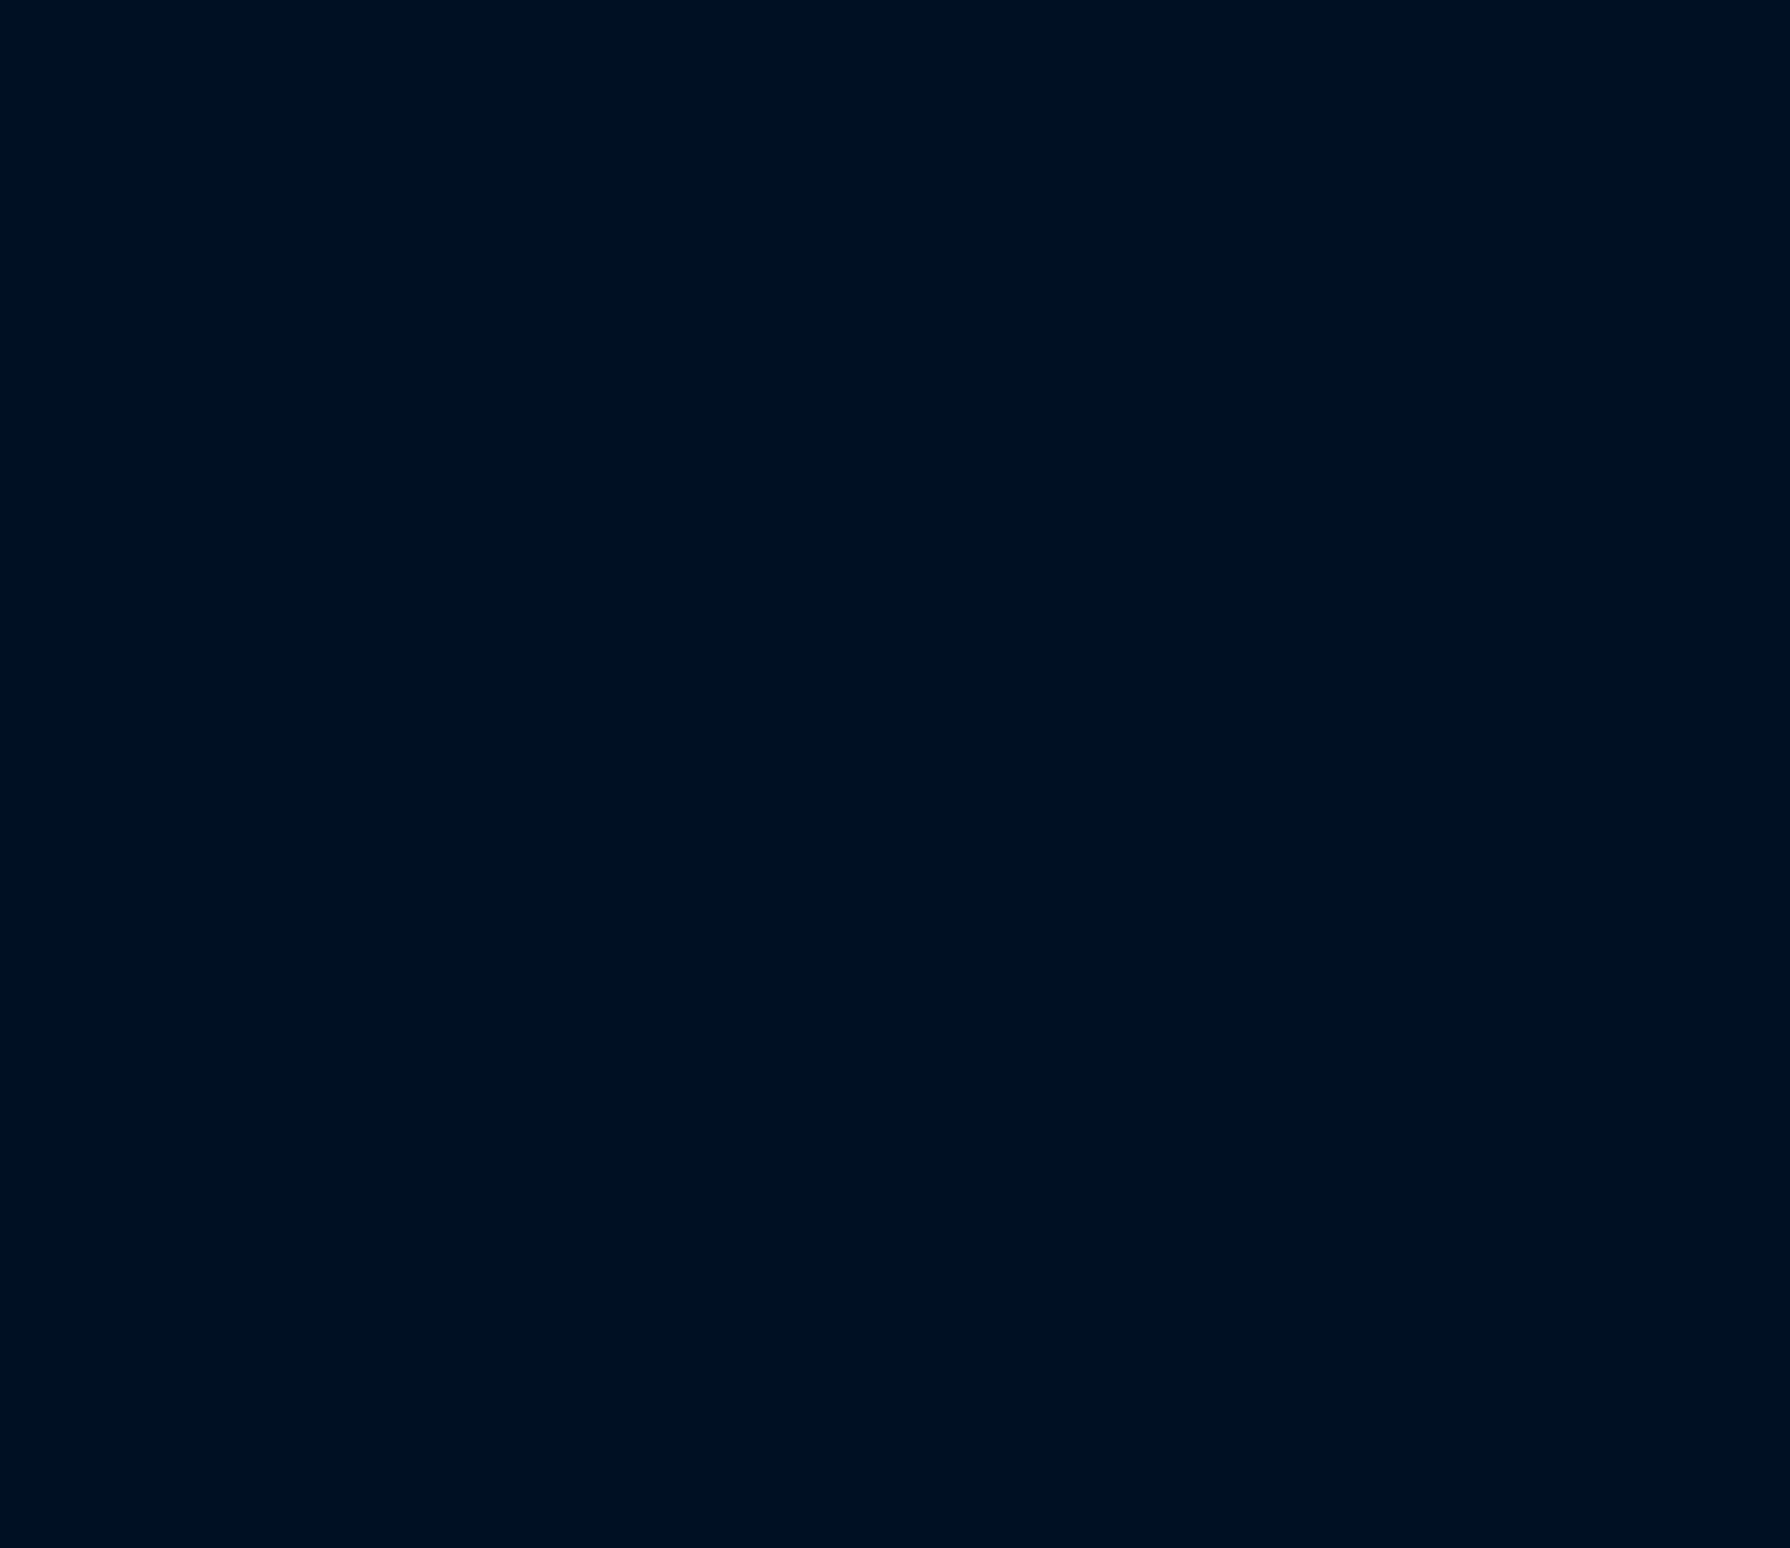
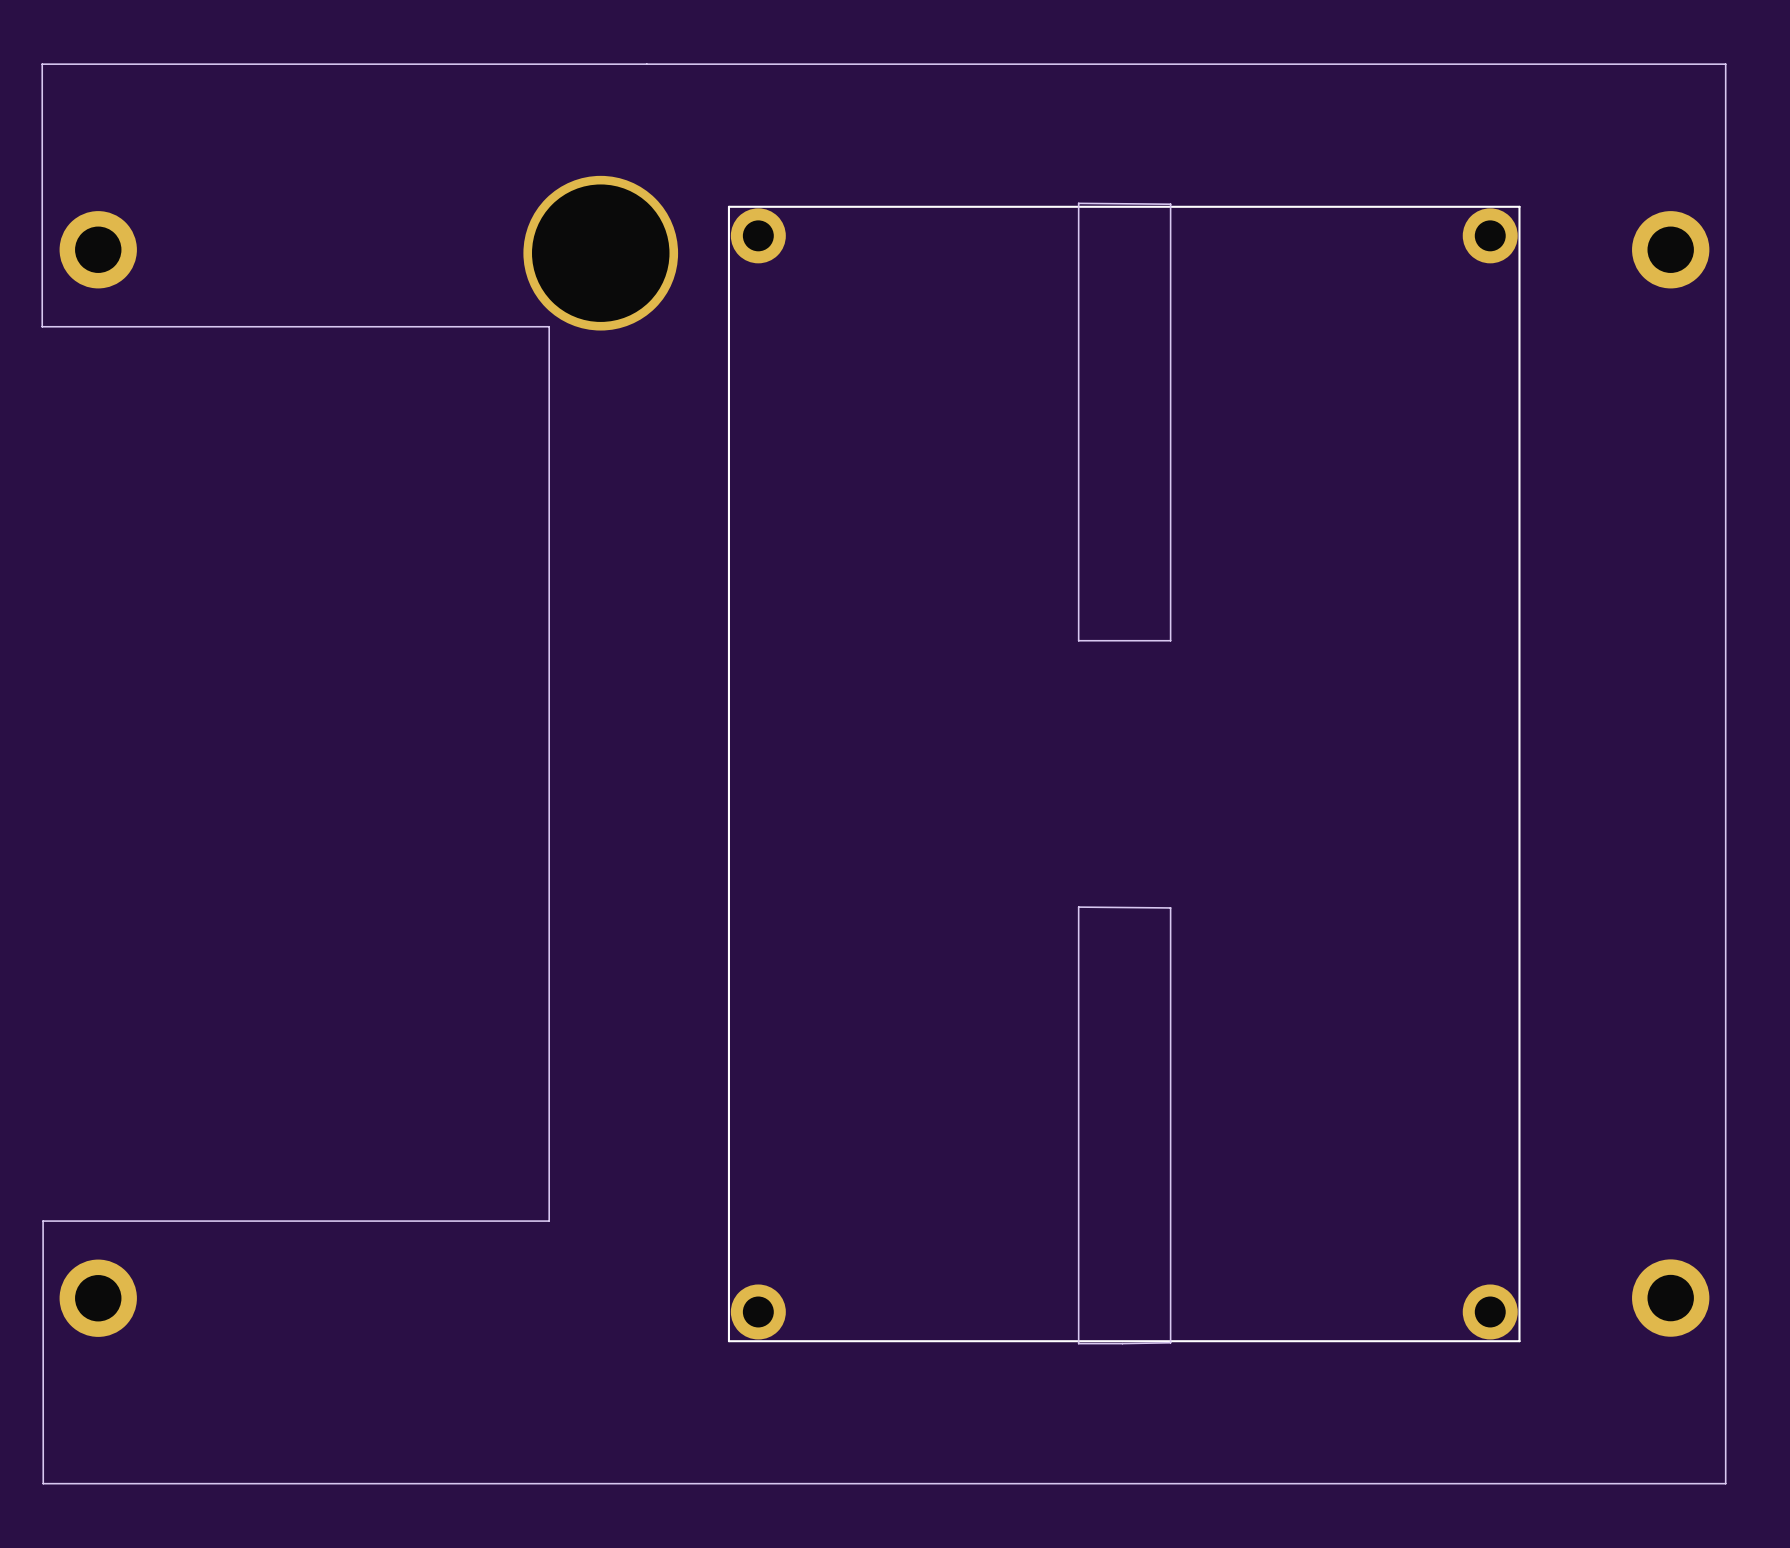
board edge: none -> (42, 64) (42, 326) (549, 326) (549, 1221) (43, 1221) (43, 1483) (1725, 1483) (1725, 64) (42, 64)
board edge: none -> (1078, 203) (1078, 640) (1170, 640) (1170, 204) (1078, 203)
line: none -> (728, 206) (728, 1341) (1519, 1341) (1519, 206) (728, 206)
part: none -> (758, 235)
part: none -> (1490, 235)
part: none -> (98, 249)
part: none -> (1670, 249)
part: none -> (600, 253)
board edge: none -> (1078, 907) (1078, 1343) (1170, 1342) (1170, 907) (1078, 907)
part: none -> (98, 1298)
part: none -> (1670, 1298)
part: none -> (758, 1311)
part: none -> (1490, 1311)

